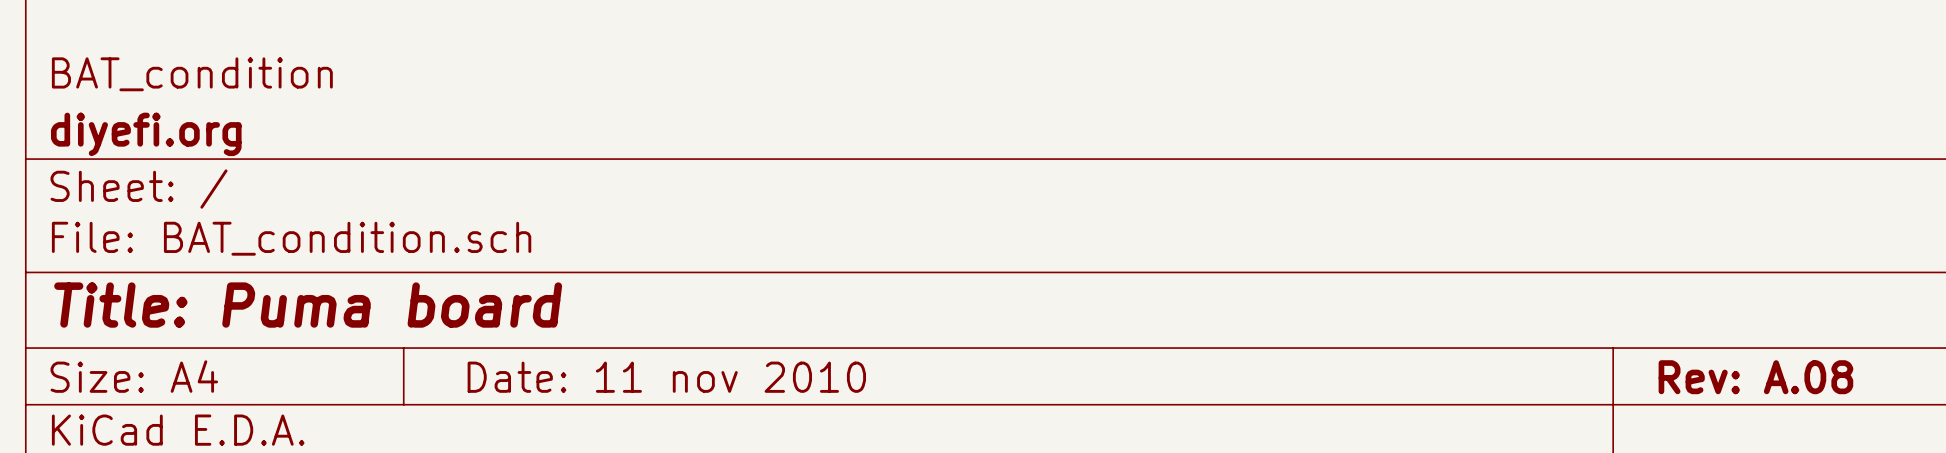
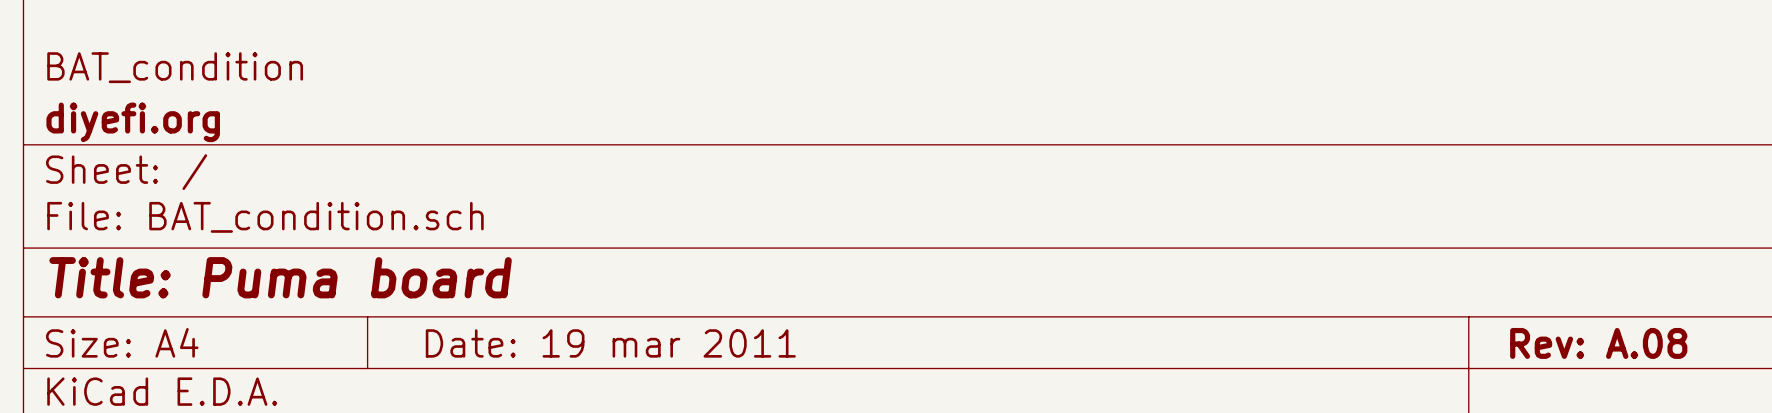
title block: Date: 11 nov 2010 (666, 377) -> Date: 19 mar 2011 (610, 343)

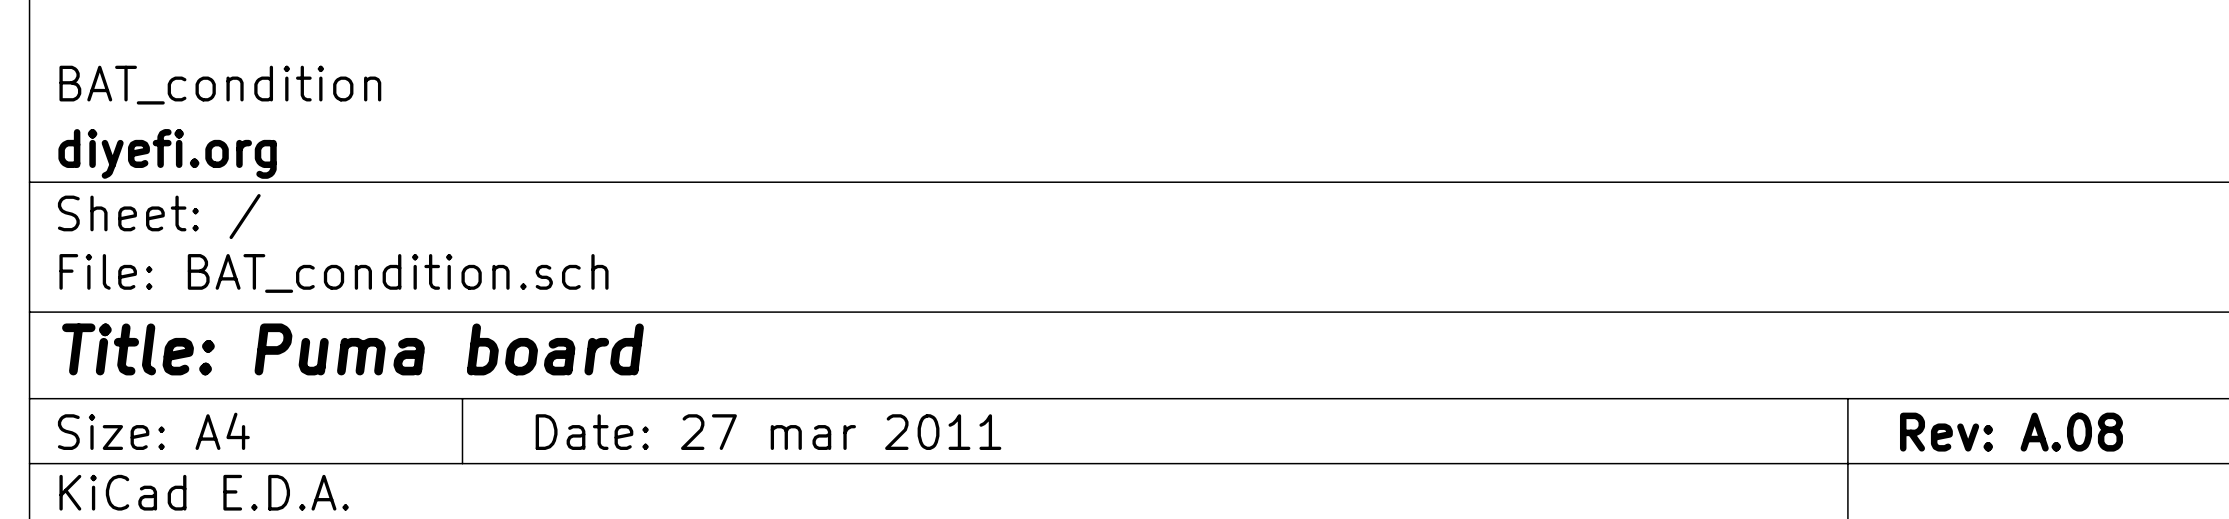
title block: Date: 19 mar 2011 (610, 343) -> Date: 27 mar 2011 (768, 432)

